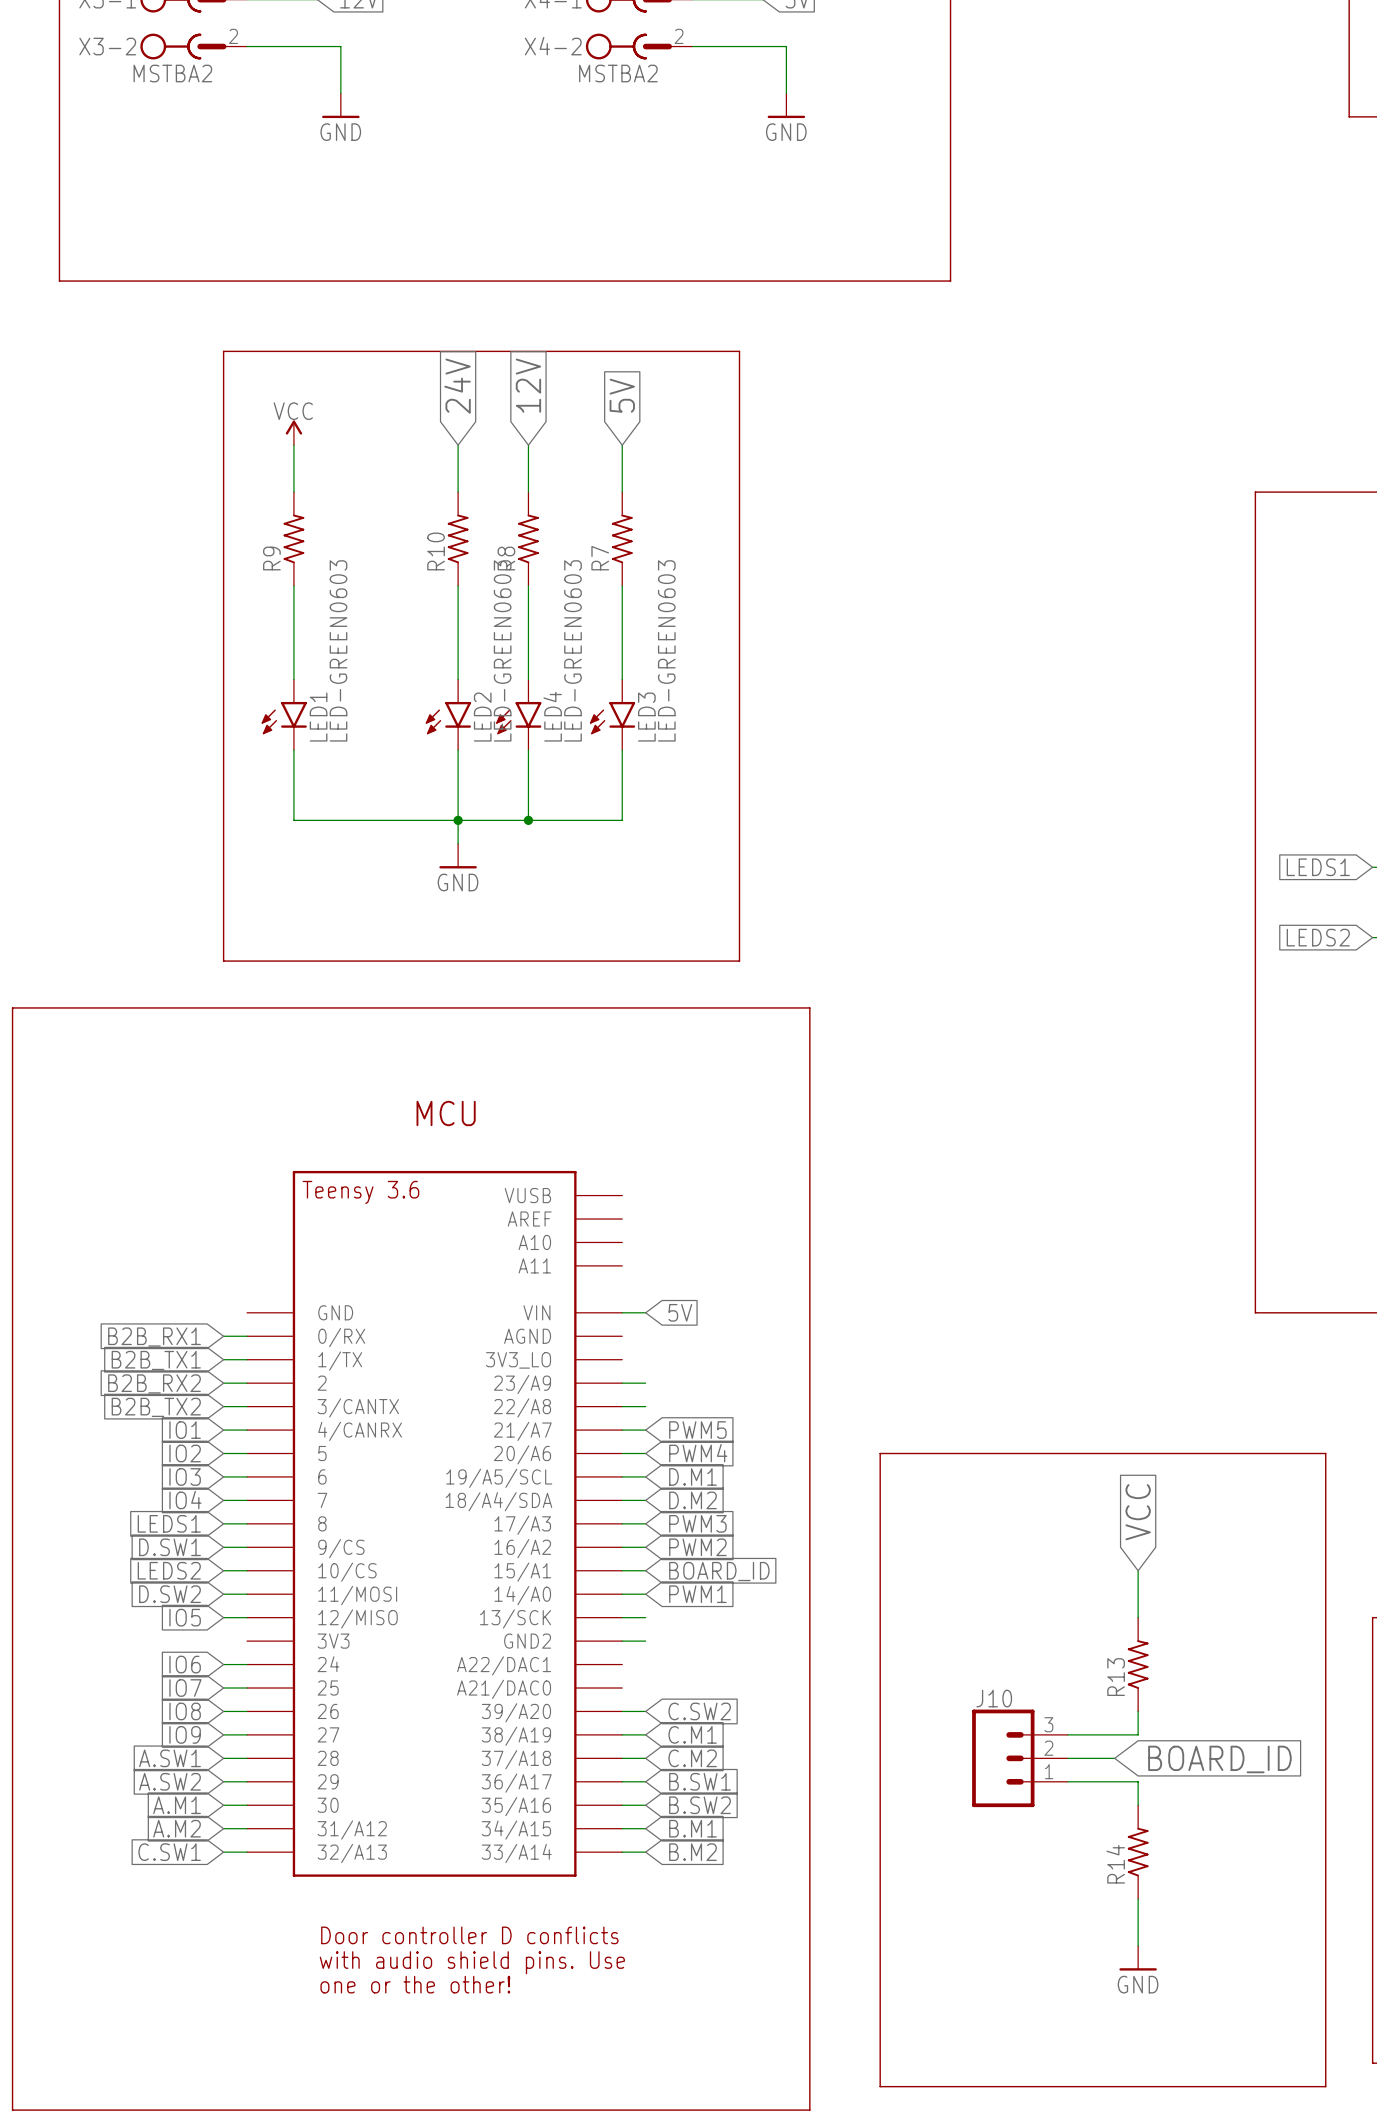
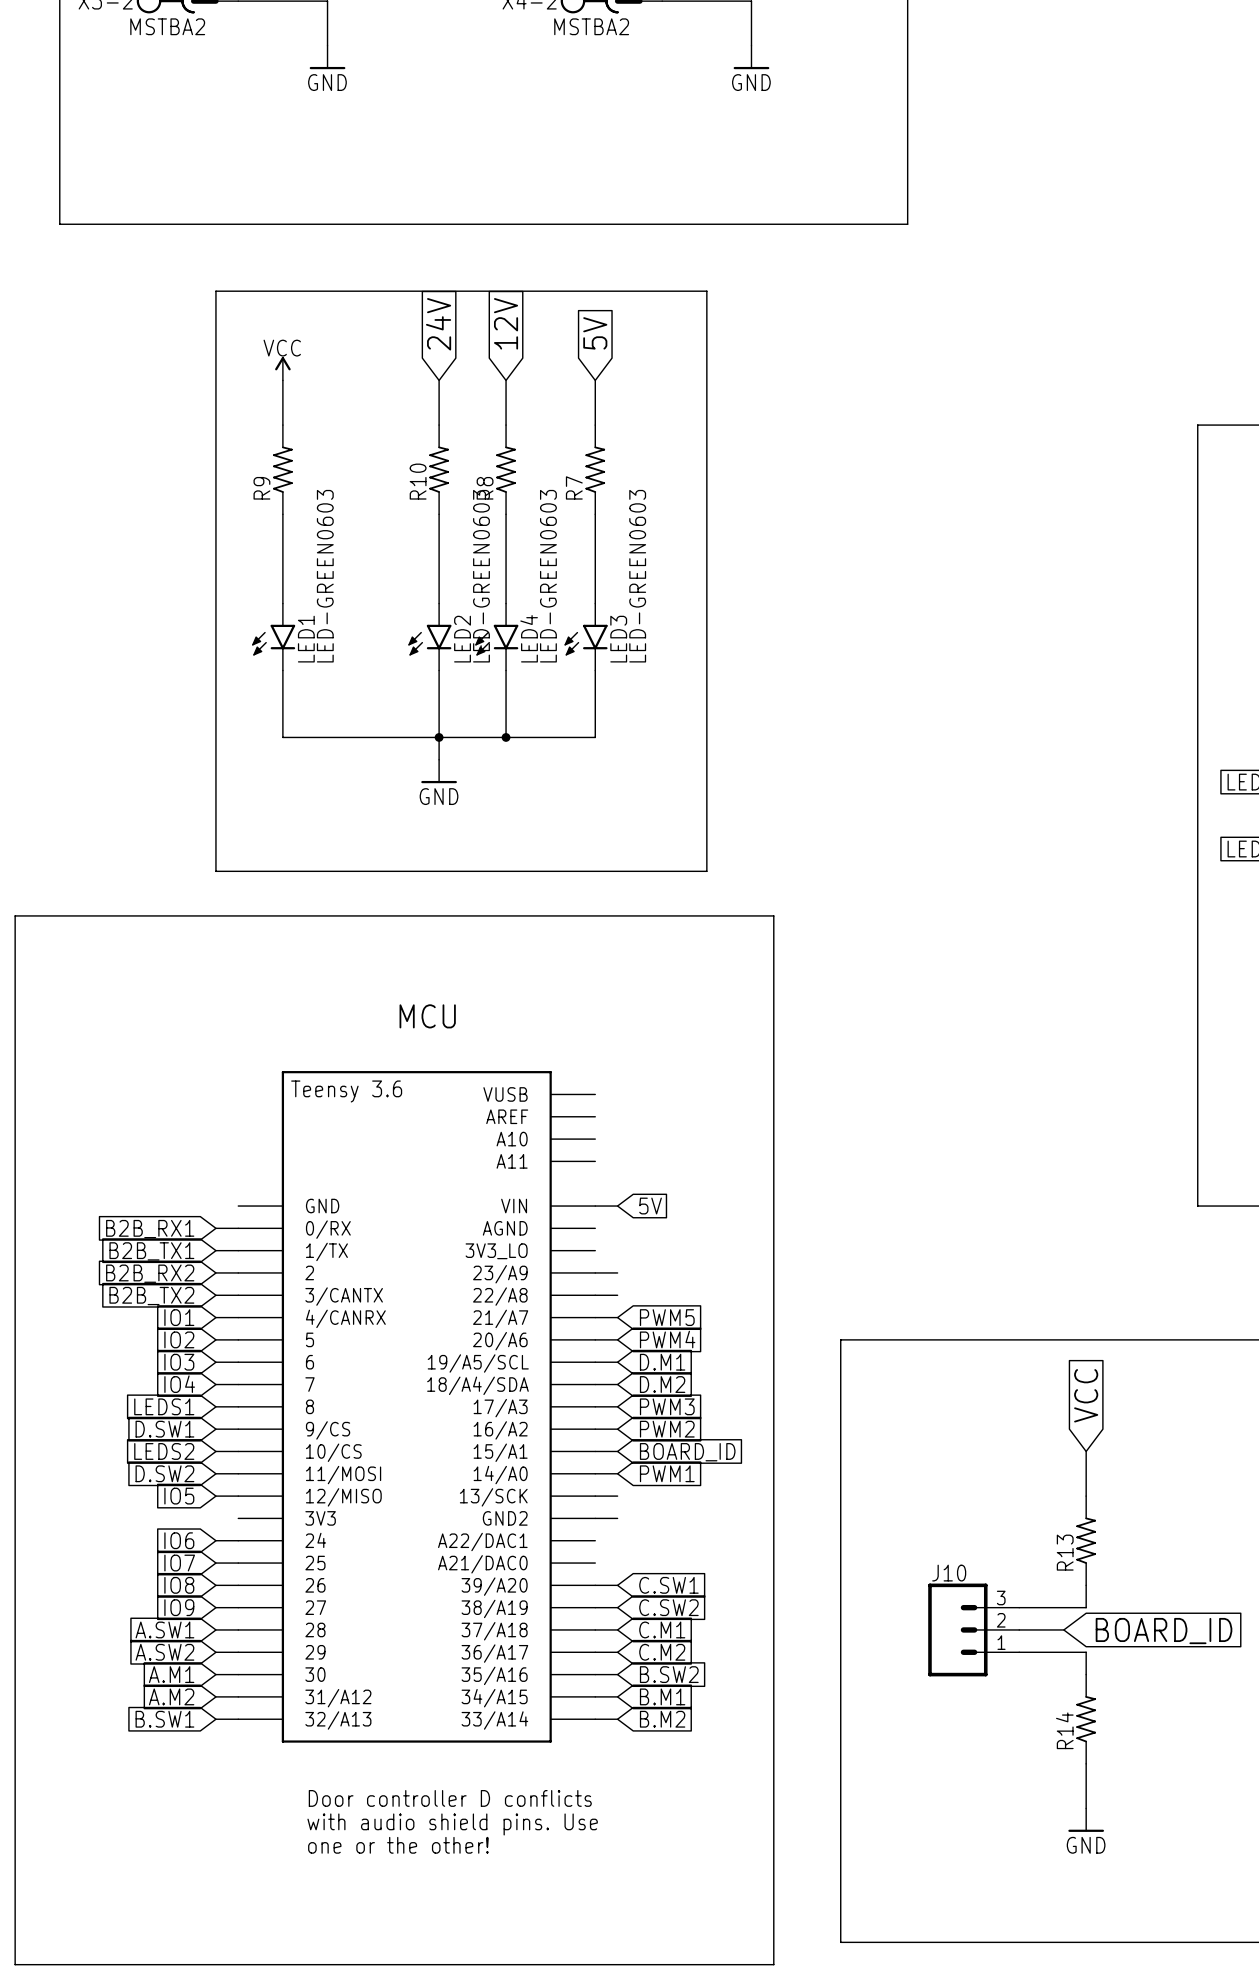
global label: C.SW2 (699, 1711) -> C.SW1 (668, 1585)
global label: C.M1 (692, 1734) -> C.SW2 (668, 1607)
global label: C.M2 (692, 1758) -> C.M1 (662, 1629)
global label: B.SW1 (700, 1781) -> C.M2 (662, 1652)
global label: C.SW1 (169, 1852) -> B.SW1 (164, 1719)

